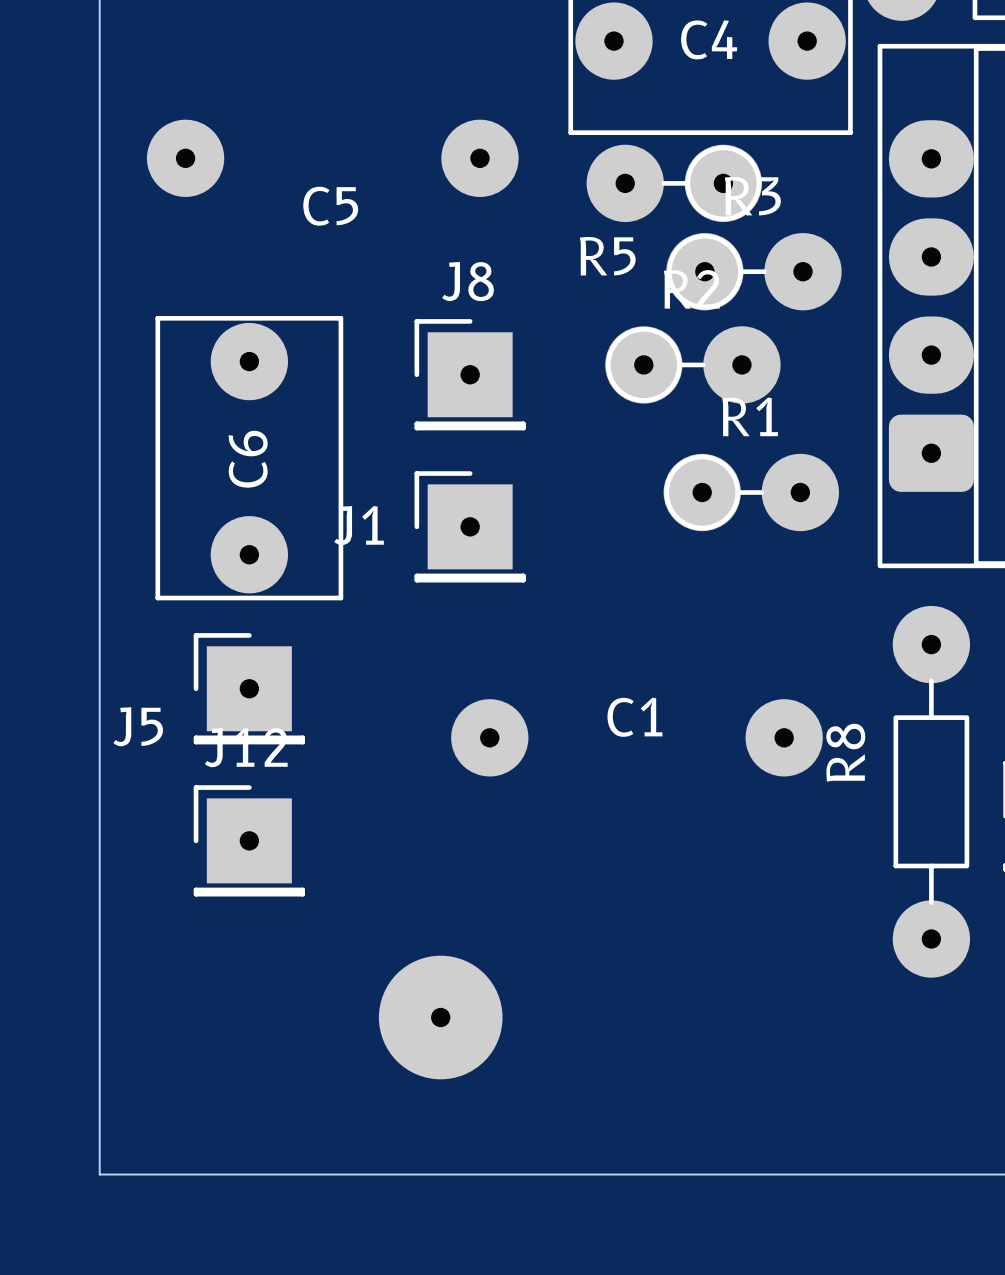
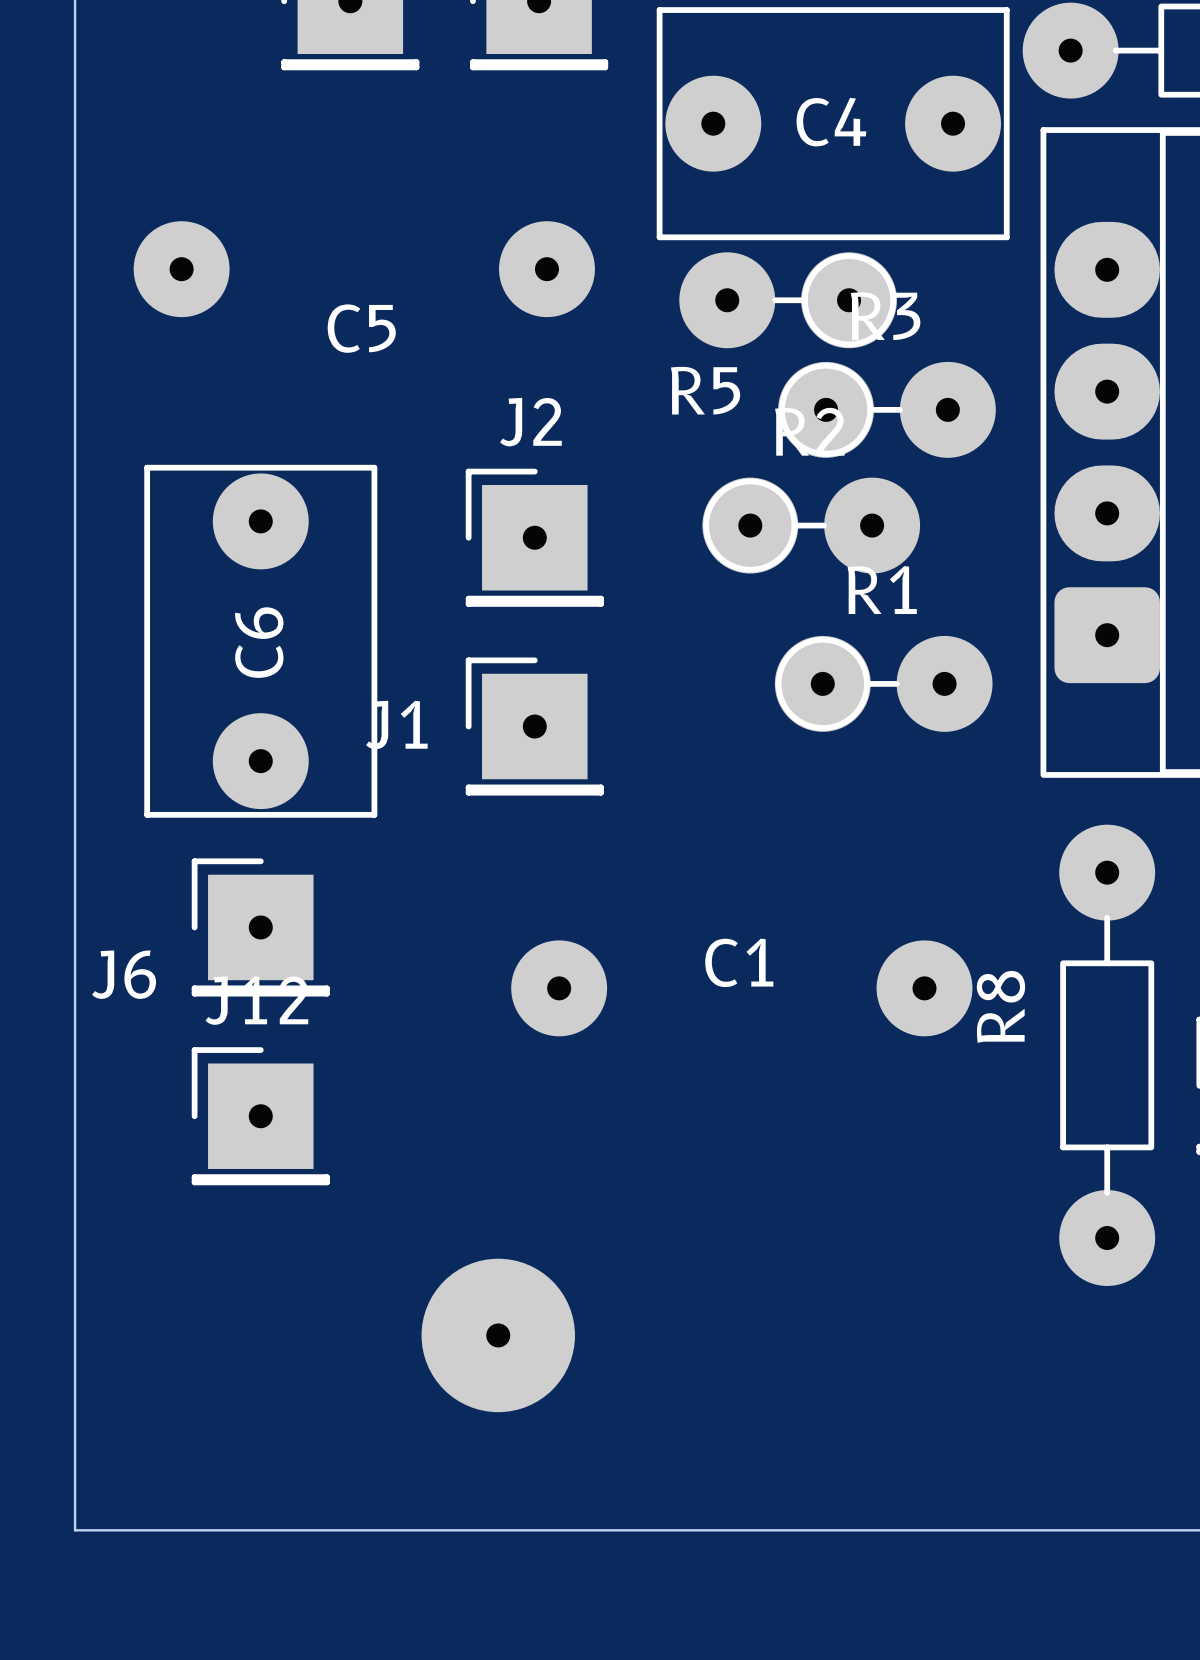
J8 name: J8 (468, 281) -> J2 (530, 422)
J5 name: J5 (138, 726) -> J6 (124, 974)

